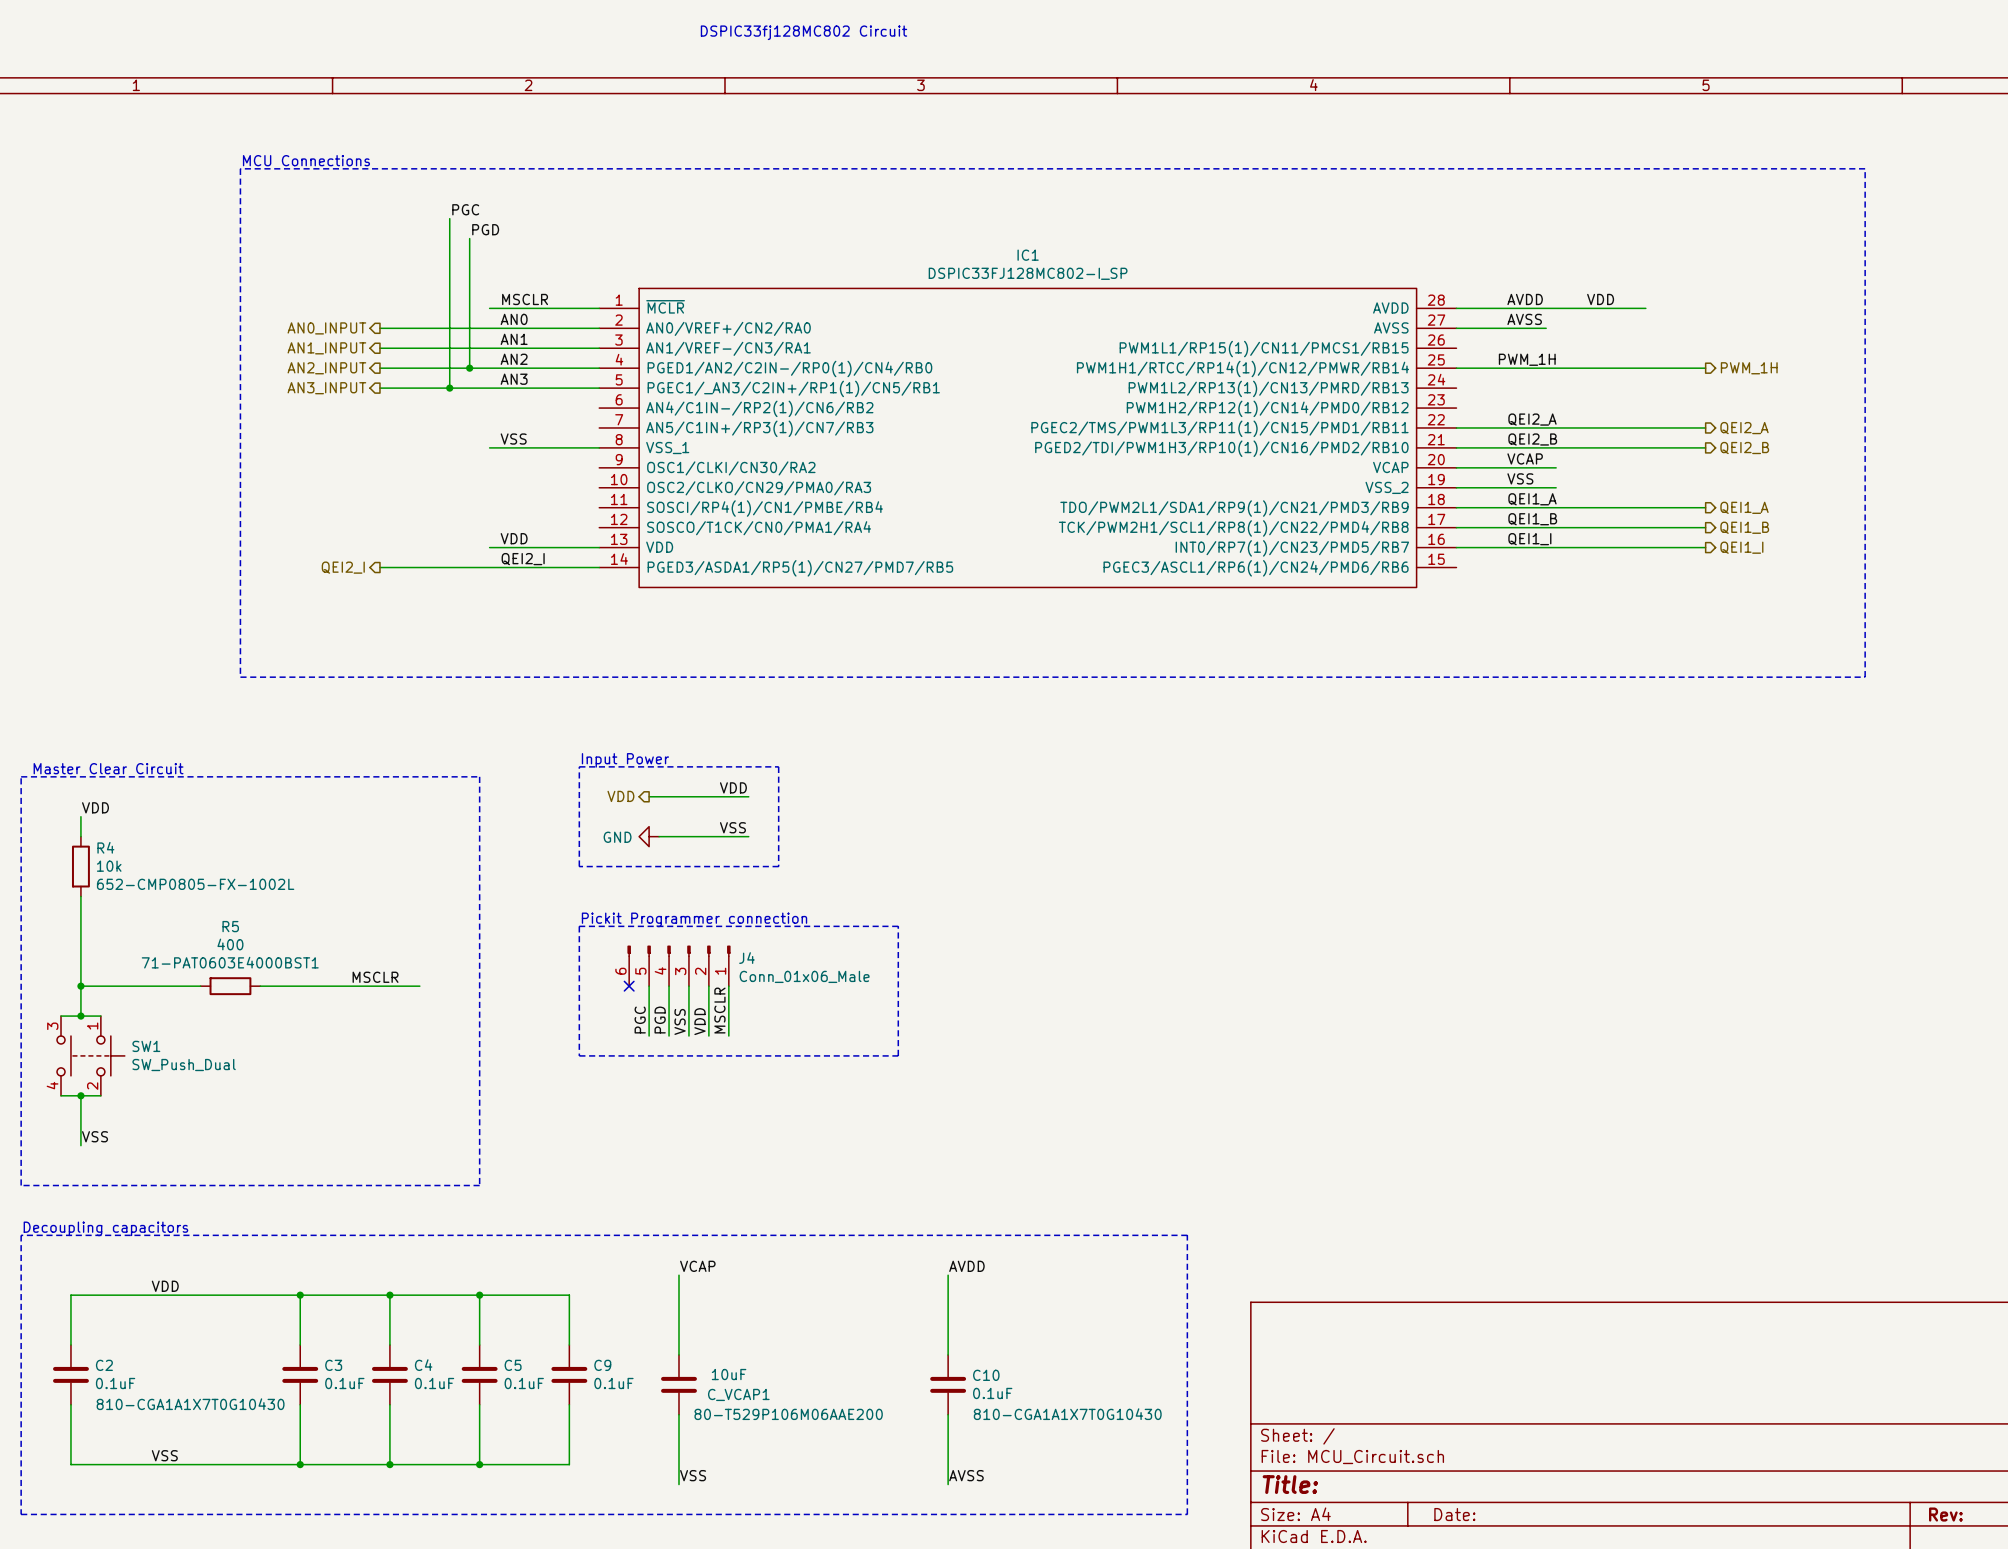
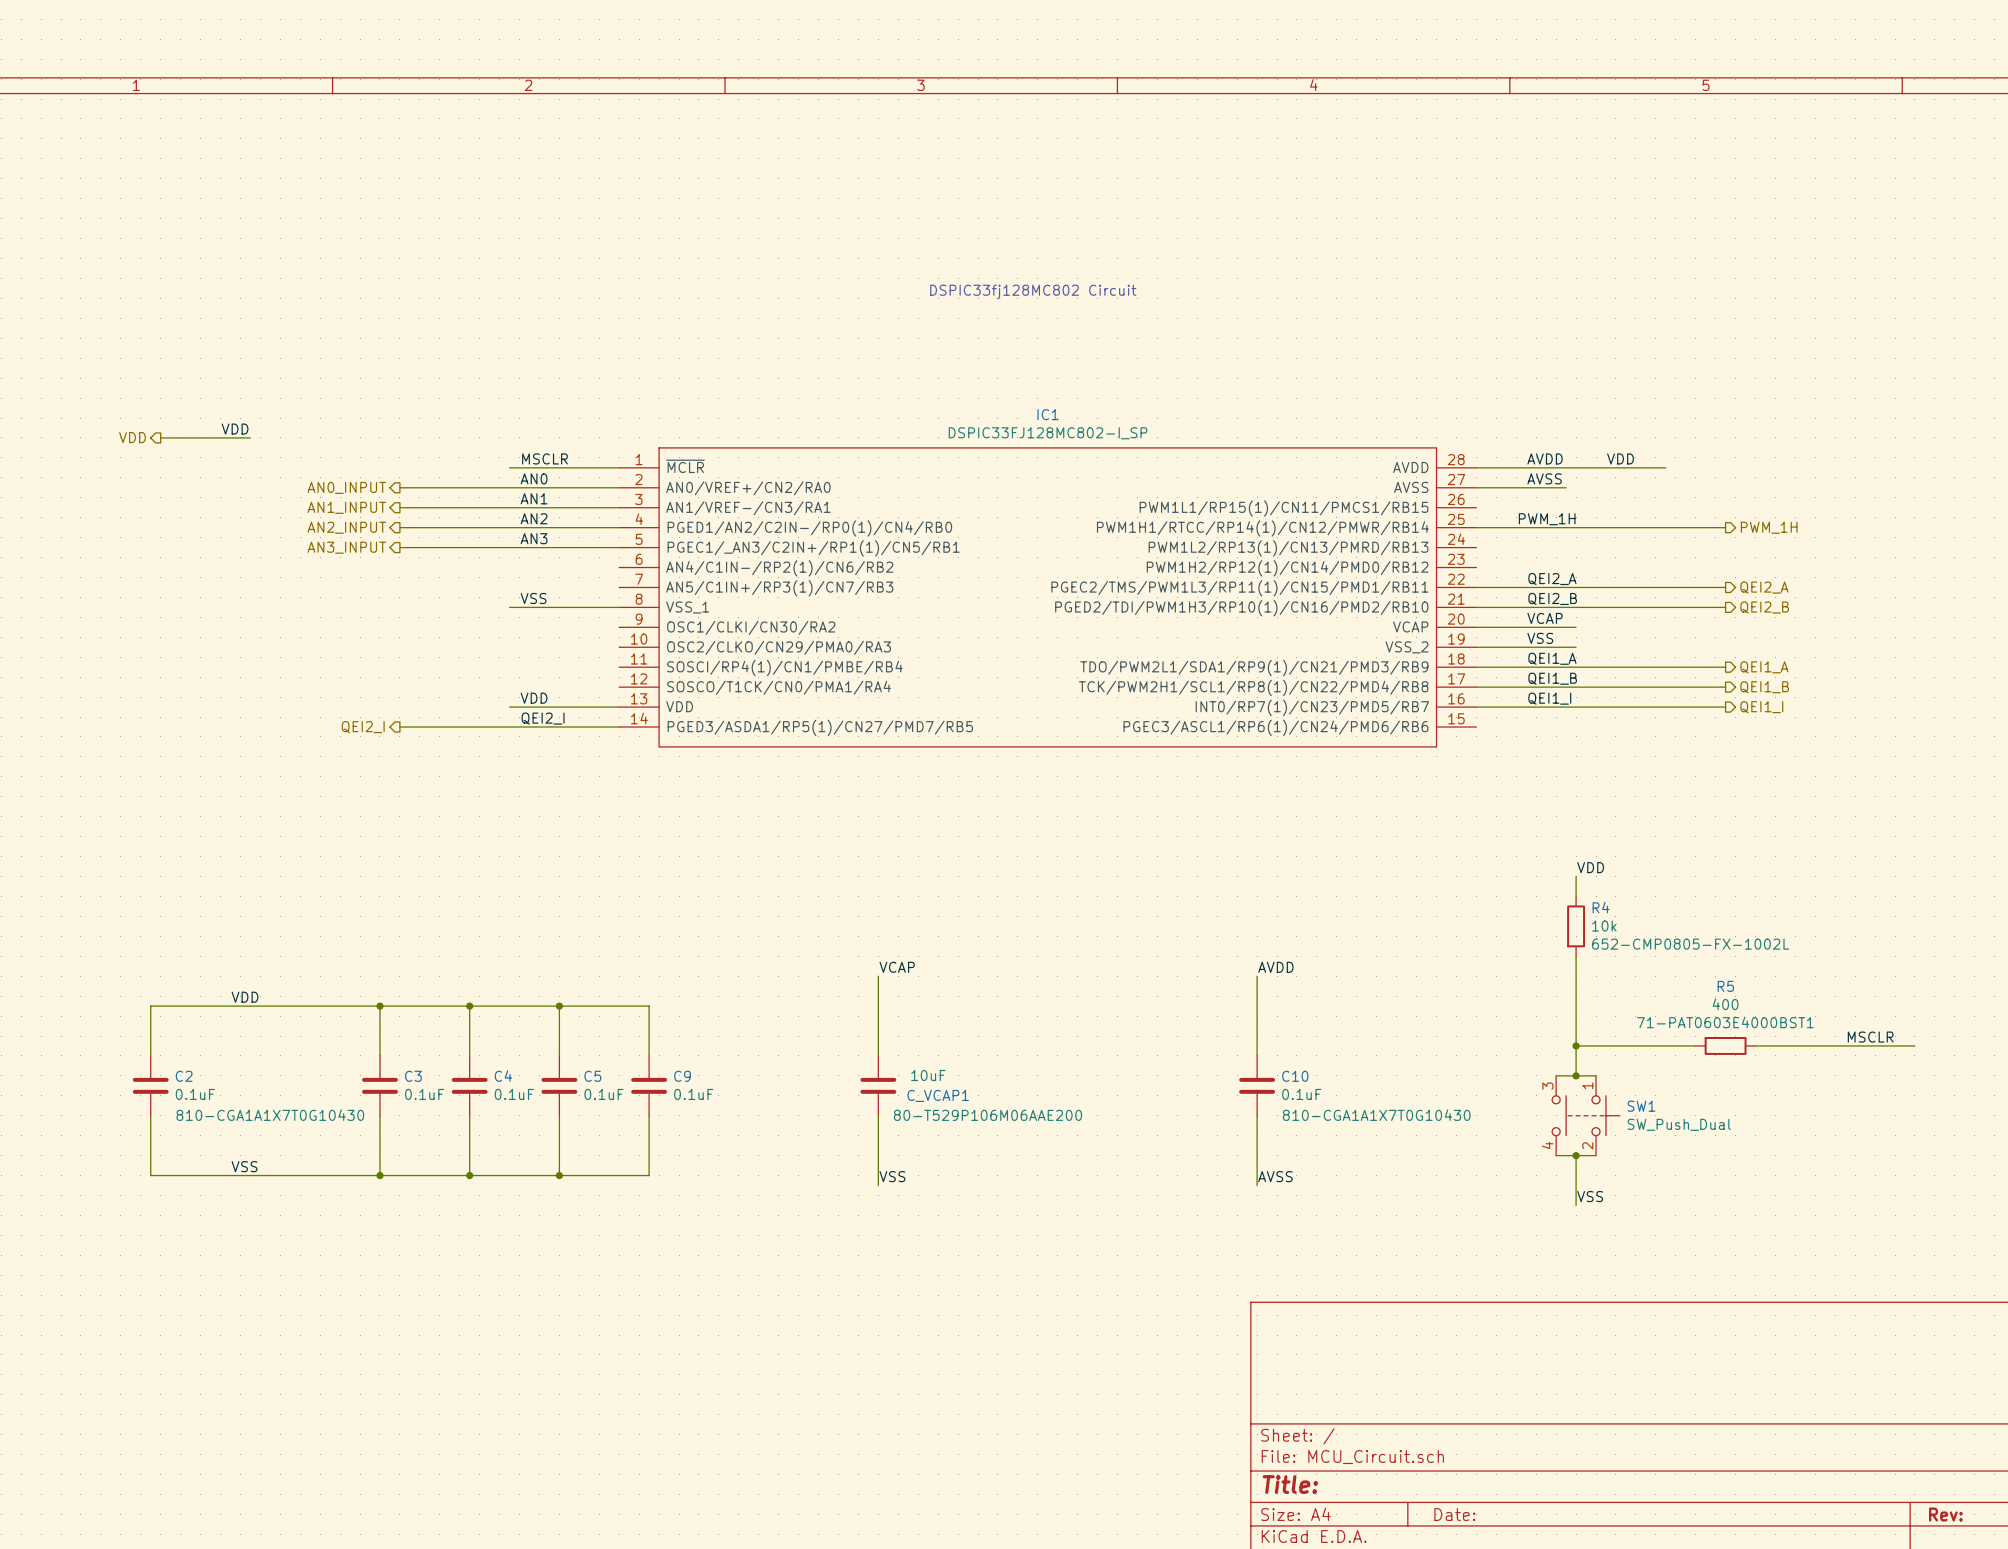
text: DSPIC33fj128MC802 Circuit (803, 32) -> none
text: MCU Connections (306, 160) -> none
line: (240, 168) (240, 677) (1865, 677) (1865, 168) (240, 168) -> none
label: PGC (465, 209) -> none
wire: (449, 218) (449, 388) -> none
label: PGD (485, 229) -> none
wire: (469, 238) (469, 368) -> none
text: none -> DSPIC33fj128MC802 Circuit (1033, 291)
label position: MSCLR (525, 299) -> MSCLR (544, 458)
label position: AVDD (1525, 299) -> AVDD (1545, 458)
label position: VDD (1600, 299) -> VDD (1620, 458)
wire: (489, 308) (599, 308) -> (509, 467) (619, 467)
wire: (1456, 308) (1645, 308) -> none
label position: AN0 (514, 319) -> AN0 (534, 478)
label position: AVSS (1524, 319) -> AVSS (1544, 478)
hierarchical label position: AN0_INPUT (326, 328) -> AN0_INPUT (346, 487)
wire: (379, 328) (599, 328) -> (399, 487) (619, 487)
wire: (1456, 328) (1546, 328) -> none
label position: AN1 (514, 339) -> AN1 (534, 498)
hierarchical label position: AN1_INPUT (326, 348) -> AN1_INPUT (346, 507)
wire: (379, 348) (599, 348) -> (399, 507) (619, 507)
label position: AN2 (514, 359) -> AN2 (534, 518)
label position: PWM_1H (1527, 359) -> PWM_1H (1547, 519)
hierarchical label position: AN2_INPUT (326, 368) -> AN2_INPUT (346, 527)
wire: (379, 368) (599, 368) -> (399, 527) (619, 527)
junction: (469, 368) -> none
wire: (1456, 368) (1705, 368) -> none
hierarchical label position: PWM_1H (1749, 368) -> PWM_1H (1769, 527)
label position: AN3 (514, 379) -> AN3 (534, 538)
hierarchical label position: AN3_INPUT (326, 388) -> AN3_INPUT (346, 547)
wire: (379, 388) (599, 388) -> none
junction: (449, 388) -> none
label position: QEI2_A (1532, 419) -> QEI2_A (1552, 579)
wire: (1456, 427) (1705, 427) -> (1476, 587) (1725, 587)
hierarchical label position: QEI2_A (1744, 428) -> QEI2_A (1764, 587)
label: none -> VDD (235, 429)
hierarchical label: none -> VDD (132, 437)
wire: none -> (160, 437) (250, 437)
IC1 position: (1027, 437) -> (1047, 597)
label: VSS (513, 439) -> none
label position: QEI2_B (1532, 439) -> QEI2_B (1552, 598)
wire: (489, 447) (599, 447) -> (509, 607) (619, 607)
wire: (1456, 447) (1705, 447) -> (1476, 607) (1725, 607)
hierarchical label position: QEI2_B (1744, 448) -> QEI2_B (1764, 607)
label position: VCAP (1525, 458) -> VCAP (1545, 618)
wire: none -> (1556, 467) (1665, 467)
label position: VSS (1520, 478) -> VSS (1540, 638)
wire: none -> (1556, 487) (1566, 487)
label position: QEI1_A (1532, 499) -> QEI1_A (1552, 658)
wire: (1456, 507) (1705, 507) -> (1476, 667) (1725, 667)
hierarchical label position: QEI1_A (1744, 507) -> QEI1_A (1764, 667)
label position: QEI1_B (1532, 519) -> QEI1_B (1552, 678)
wire: none -> (1705, 527) (1725, 527)
hierarchical label position: QEI1_B (1744, 527) -> QEI1_B (1764, 687)
label: VDD (514, 538) -> none
label position: QEI1_I (1529, 539) -> QEI1_I (1549, 698)
wire: none -> (399, 547) (489, 547)
wire: (1456, 547) (1705, 547) -> (1476, 707) (1725, 707)
hierarchical label position: QEI1_I (1741, 547) -> QEI1_I (1761, 707)
label position: QEI2_I (523, 559) -> QEI2_I (543, 718)
hierarchical label position: QEI2_I (343, 567) -> QEI2_I (363, 727)
wire: (379, 567) (599, 567) -> (399, 727) (619, 727)
label: none -> VSS (533, 598)
wire: none -> (1476, 627) (1576, 627)
wire: none -> (1476, 647) (1576, 647)
wire: none -> (1476, 687) (1725, 687)
label: none -> VDD (534, 698)
wire: none -> (509, 707) (619, 707)
text: Input Power (625, 760) -> none
line: (579, 766) (579, 866) (778, 866) (778, 766) (579, 766) -> none
text: Master Clear Circuit (108, 768) -> none
line: (21, 776) (21, 1185) (479, 1185) (479, 776) (21, 776) -> none
label: VDD (733, 787) -> none
hierarchical label: VDD (620, 796) -> none
wire: (649, 796) (748, 796) -> none
label: VDD (95, 807) -> none
wire: (80, 816) (80, 836) -> none
label: VSS (732, 827) -> none
power symbol: GND (649, 836) -> none
wire: (659, 836) (748, 836) -> none
R4 position: (80, 866) -> (1576, 926)
label: none -> VDD (1590, 867)
wire: none -> (1576, 876) (1576, 896)
wire: (80, 896) (80, 1016) -> none
text: Pickit Programmer connection (694, 919) -> none
line: (579, 926) (898, 926) (898, 1055) (579, 1055) (579, 926) -> none
wire: none -> (1576, 956) (1576, 1075)
J4: Conn_01x06_Male (679, 965) -> none
label: none -> VCAP (897, 967)
label: none -> AVDD (1275, 967)
wire: none -> (878, 976) (878, 1055)
wire: none -> (1257, 976) (1257, 1055)
label: MSCLR (375, 977) -> none
wire: (80, 986) (200, 986) -> none
junction: (80, 986) -> none
R5 position: (230, 986) -> (1725, 1045)
wire: (260, 986) (419, 986) -> none
no-connect mark: (629, 986) -> none
wire: (649, 986) (649, 1006) -> (150, 1055) (150, 1006) (649, 1006)
wire: (669, 986) (669, 1036) -> (559, 1006) (559, 1055)
wire: (688, 986) (688, 1036) -> none
wire: (708, 986) (708, 1036) -> none
wire: (728, 986) (728, 1036) -> none
label: none -> VDD (245, 997)
wire: none -> (379, 1006) (379, 1055)
junction: none -> (379, 1006)
wire: none -> (469, 1006) (469, 1055)
junction: none -> (469, 1006)
junction: none -> (559, 1006)
label: MSCLR (719, 1010) -> none
wire: (61, 1016) (100, 1016) -> none
junction: (80, 1016) -> none
label: PGC (640, 1020) -> none
label: PGD (660, 1020) -> none
label: VSS (680, 1021) -> none
label: VDD (700, 1021) -> none
wire: none -> (649, 1036) (649, 1055)
label: none -> MSCLR (1870, 1037)
wire: none -> (1576, 1045) (1695, 1045)
junction: none -> (1576, 1045)
wire: none -> (1755, 1045) (1914, 1045)
SW1 position: (90, 1055) -> (1586, 1115)
wire: none -> (1556, 1075) (1596, 1075)
junction: none -> (1576, 1075)
wire: (61, 1095) (100, 1095) -> none
wire: (80, 1095) (80, 1145) -> none
junction: (80, 1095) -> none
wire: none -> (150, 1115) (150, 1175) (649, 1175) (649, 1115)
wire: none -> (379, 1115) (379, 1175)
wire: none -> (469, 1115) (469, 1175)
wire: none -> (559, 1115) (559, 1175)
wire: none -> (878, 1115) (878, 1185)
wire: none -> (1257, 1115) (1257, 1185)
label: VSS (95, 1136) -> none
wire: none -> (1556, 1155) (1596, 1155)
wire: none -> (1576, 1155) (1576, 1205)
junction: none -> (1576, 1155)
label: none -> VSS (244, 1166)
junction: none -> (379, 1175)
junction: none -> (469, 1175)
junction: none -> (559, 1175)
label: none -> VSS (892, 1176)
label: none -> AVSS (1275, 1176)
label: none -> VSS (1590, 1196)
text: Decoupling capacitors (105, 1228) -> none
line: (21, 1235) (21, 1514) (1187, 1514) (1187, 1235) (21, 1235) -> none
label: VCAP (697, 1266) -> none
label: AVDD (966, 1266) -> none
wire: (679, 1275) (679, 1354) -> none
wire: (948, 1275) (948, 1354) -> none
label: VDD (165, 1286) -> none
wire: (300, 1295) (300, 1345) -> none
junction: (300, 1295) -> none
wire: (389, 1295) (389, 1345) -> none
junction: (389, 1295) -> none
wire: (479, 1295) (479, 1345) -> none
junction: (479, 1295) -> none
wire: (70, 1345) (70, 1295) (569, 1295) (569, 1345) -> none
C2 position: (70, 1374) -> (150, 1085)
C3 position: (300, 1374) -> (379, 1085)
C4 position: (389, 1374) -> (469, 1085)
C5 position: (479, 1374) -> (559, 1085)
C9 position: (569, 1374) -> (649, 1085)
C_VCAP1 position: (679, 1384) -> (878, 1085)
C10 position: (948, 1384) -> (1257, 1085)
wire: (70, 1404) (70, 1464) (569, 1464) (569, 1404) -> none
wire: (300, 1404) (300, 1464) -> none
wire: (389, 1404) (389, 1464) -> none
wire: (479, 1404) (479, 1464) -> none
wire: (679, 1414) (679, 1484) -> none
wire: (948, 1414) (948, 1484) -> none
label: VSS (164, 1455) -> none
junction: (300, 1464) -> none
junction: (389, 1464) -> none
junction: (479, 1464) -> none
label: VSS (693, 1475) -> none
label: AVSS (966, 1475) -> none

